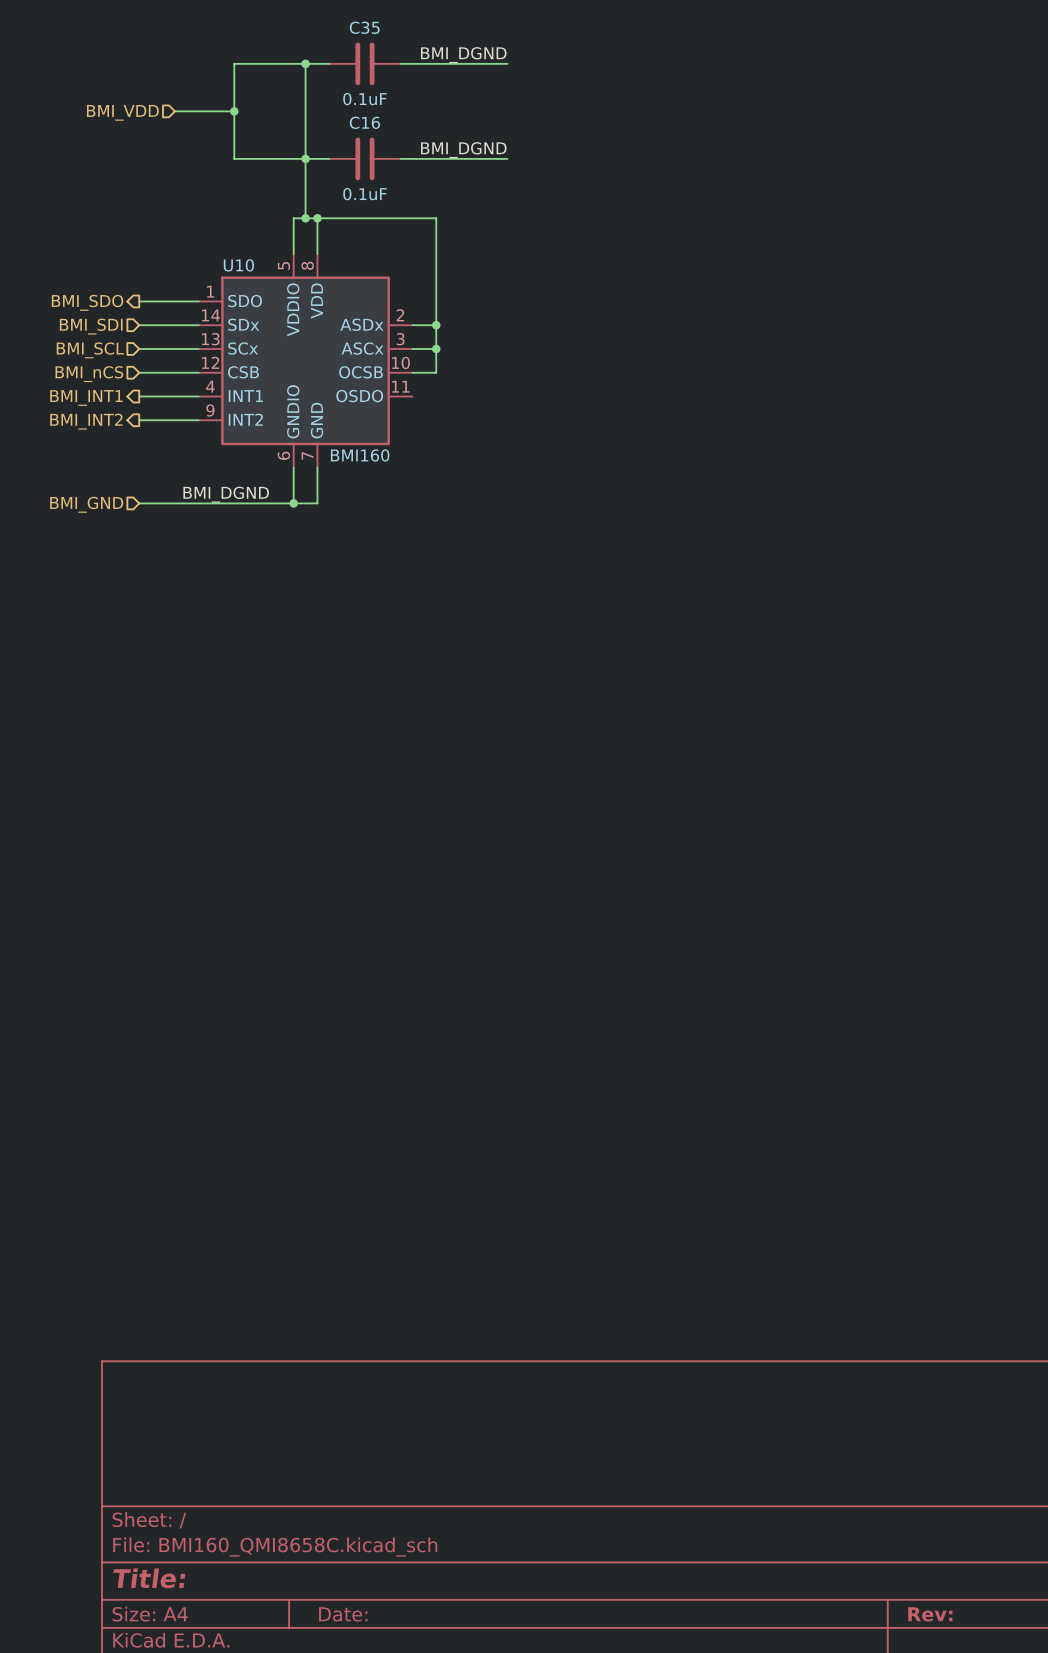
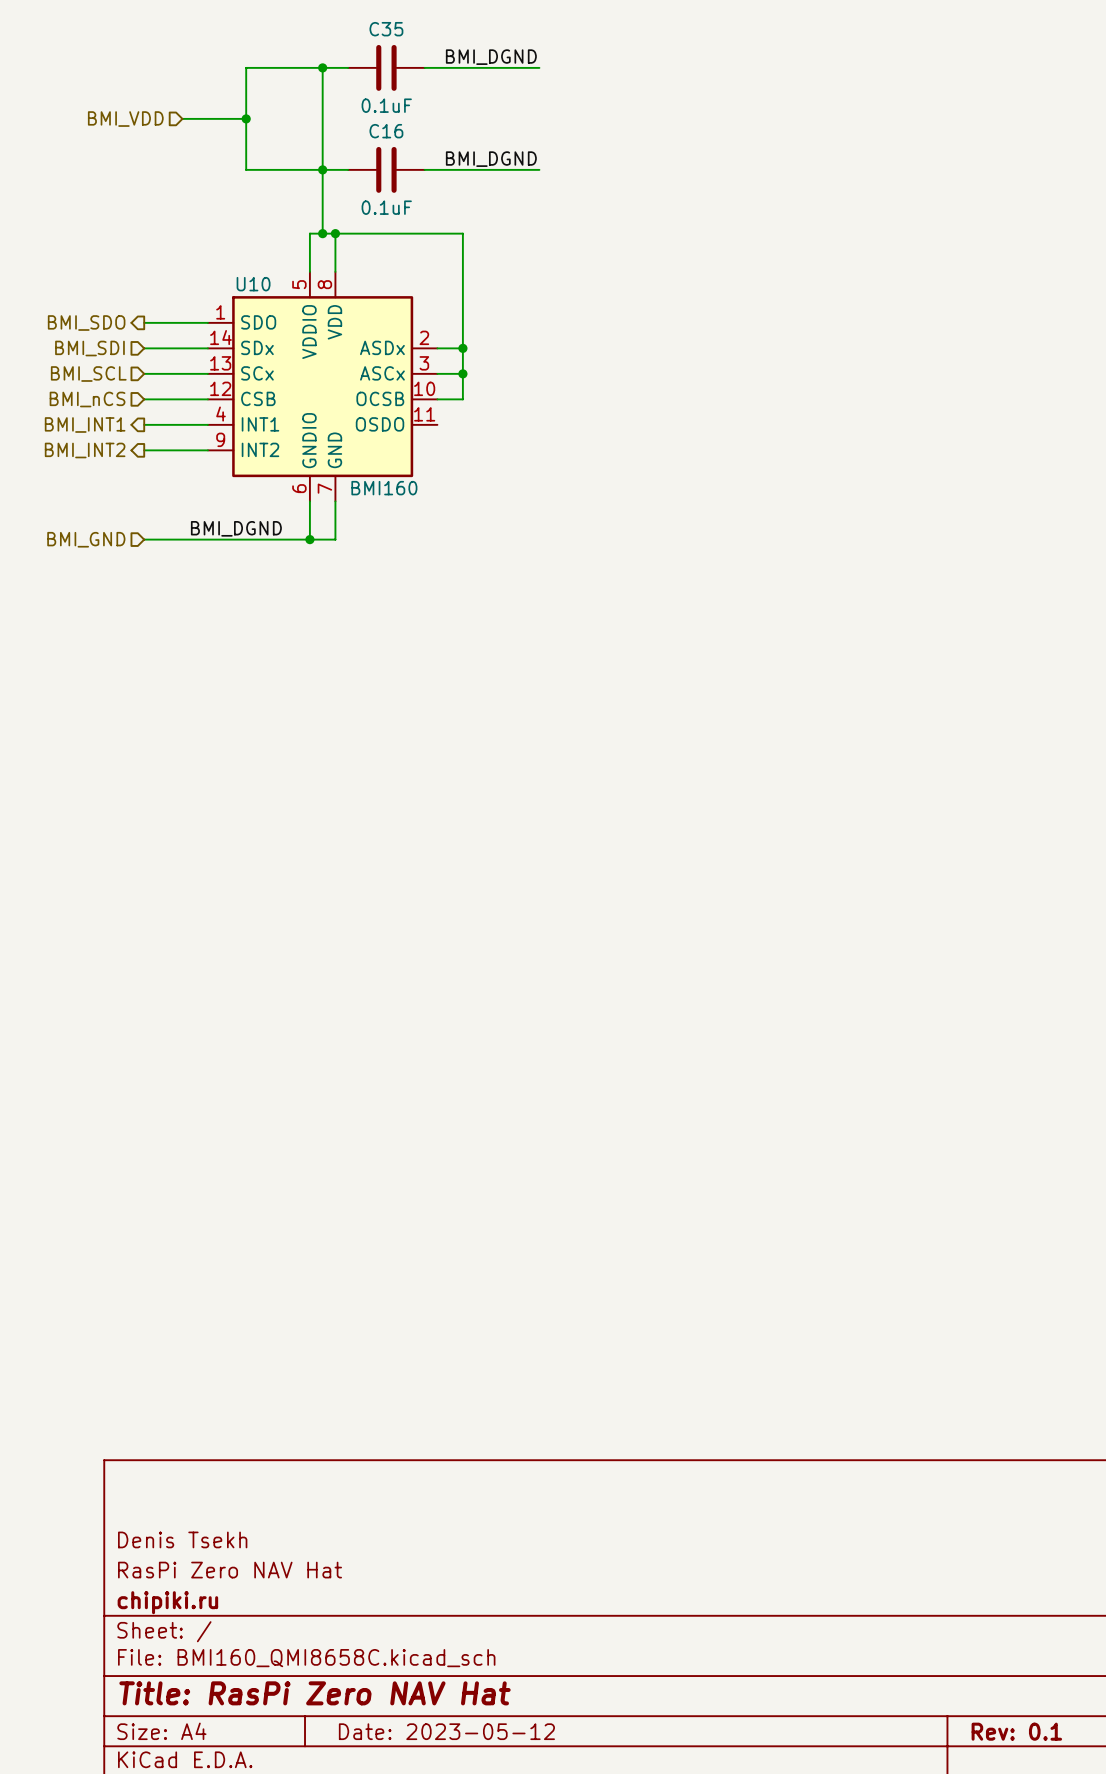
title block: none -> Denis Tsekh (182, 1539)
title block: none -> RasPi Zero NAV Hat (230, 1570)
title block: none -> chipiki.ru (167, 1602)
title block: Title: (149, 1578) -> Title: RasPi Zero NAV Hat (315, 1693)
title block: Date: (343, 1614) -> Date: 2023-05-12 (446, 1731)
title block: Rev: (930, 1614) -> Rev: 0.1 (1016, 1731)

